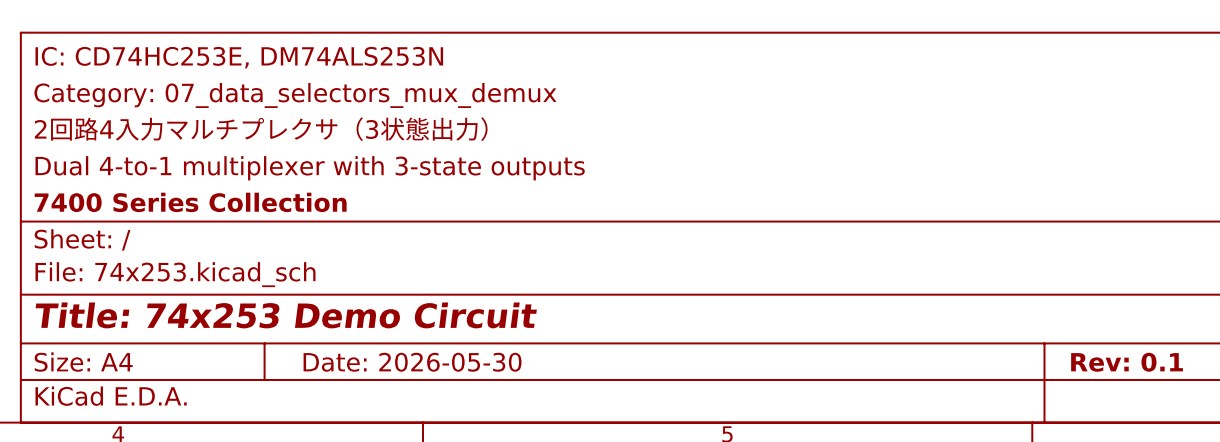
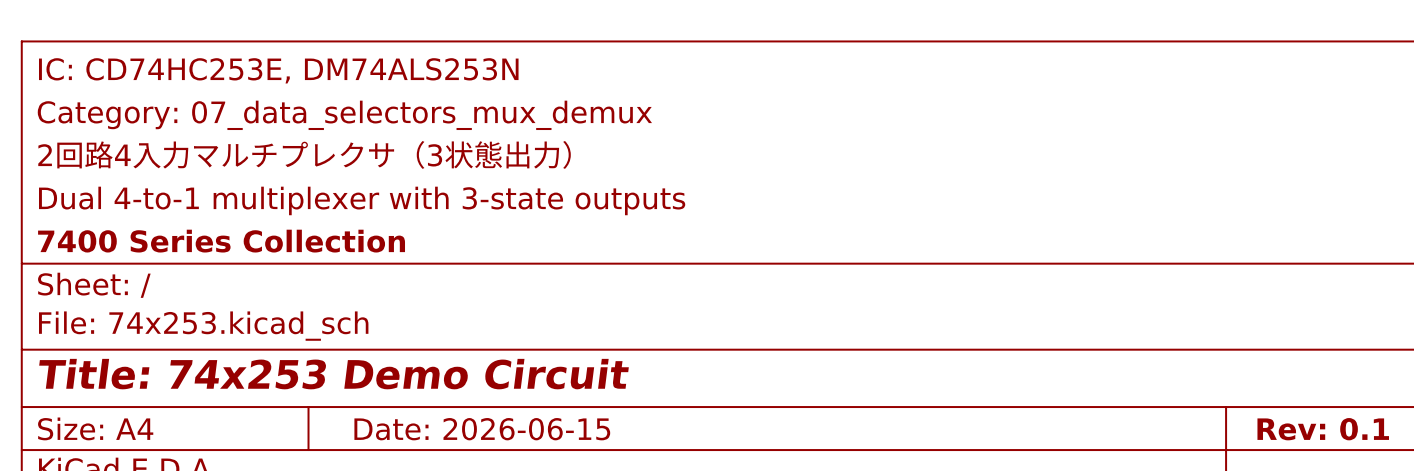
title block: Date: 2026-05-30 (412, 362) -> Date: 2026-06-15 (482, 429)

